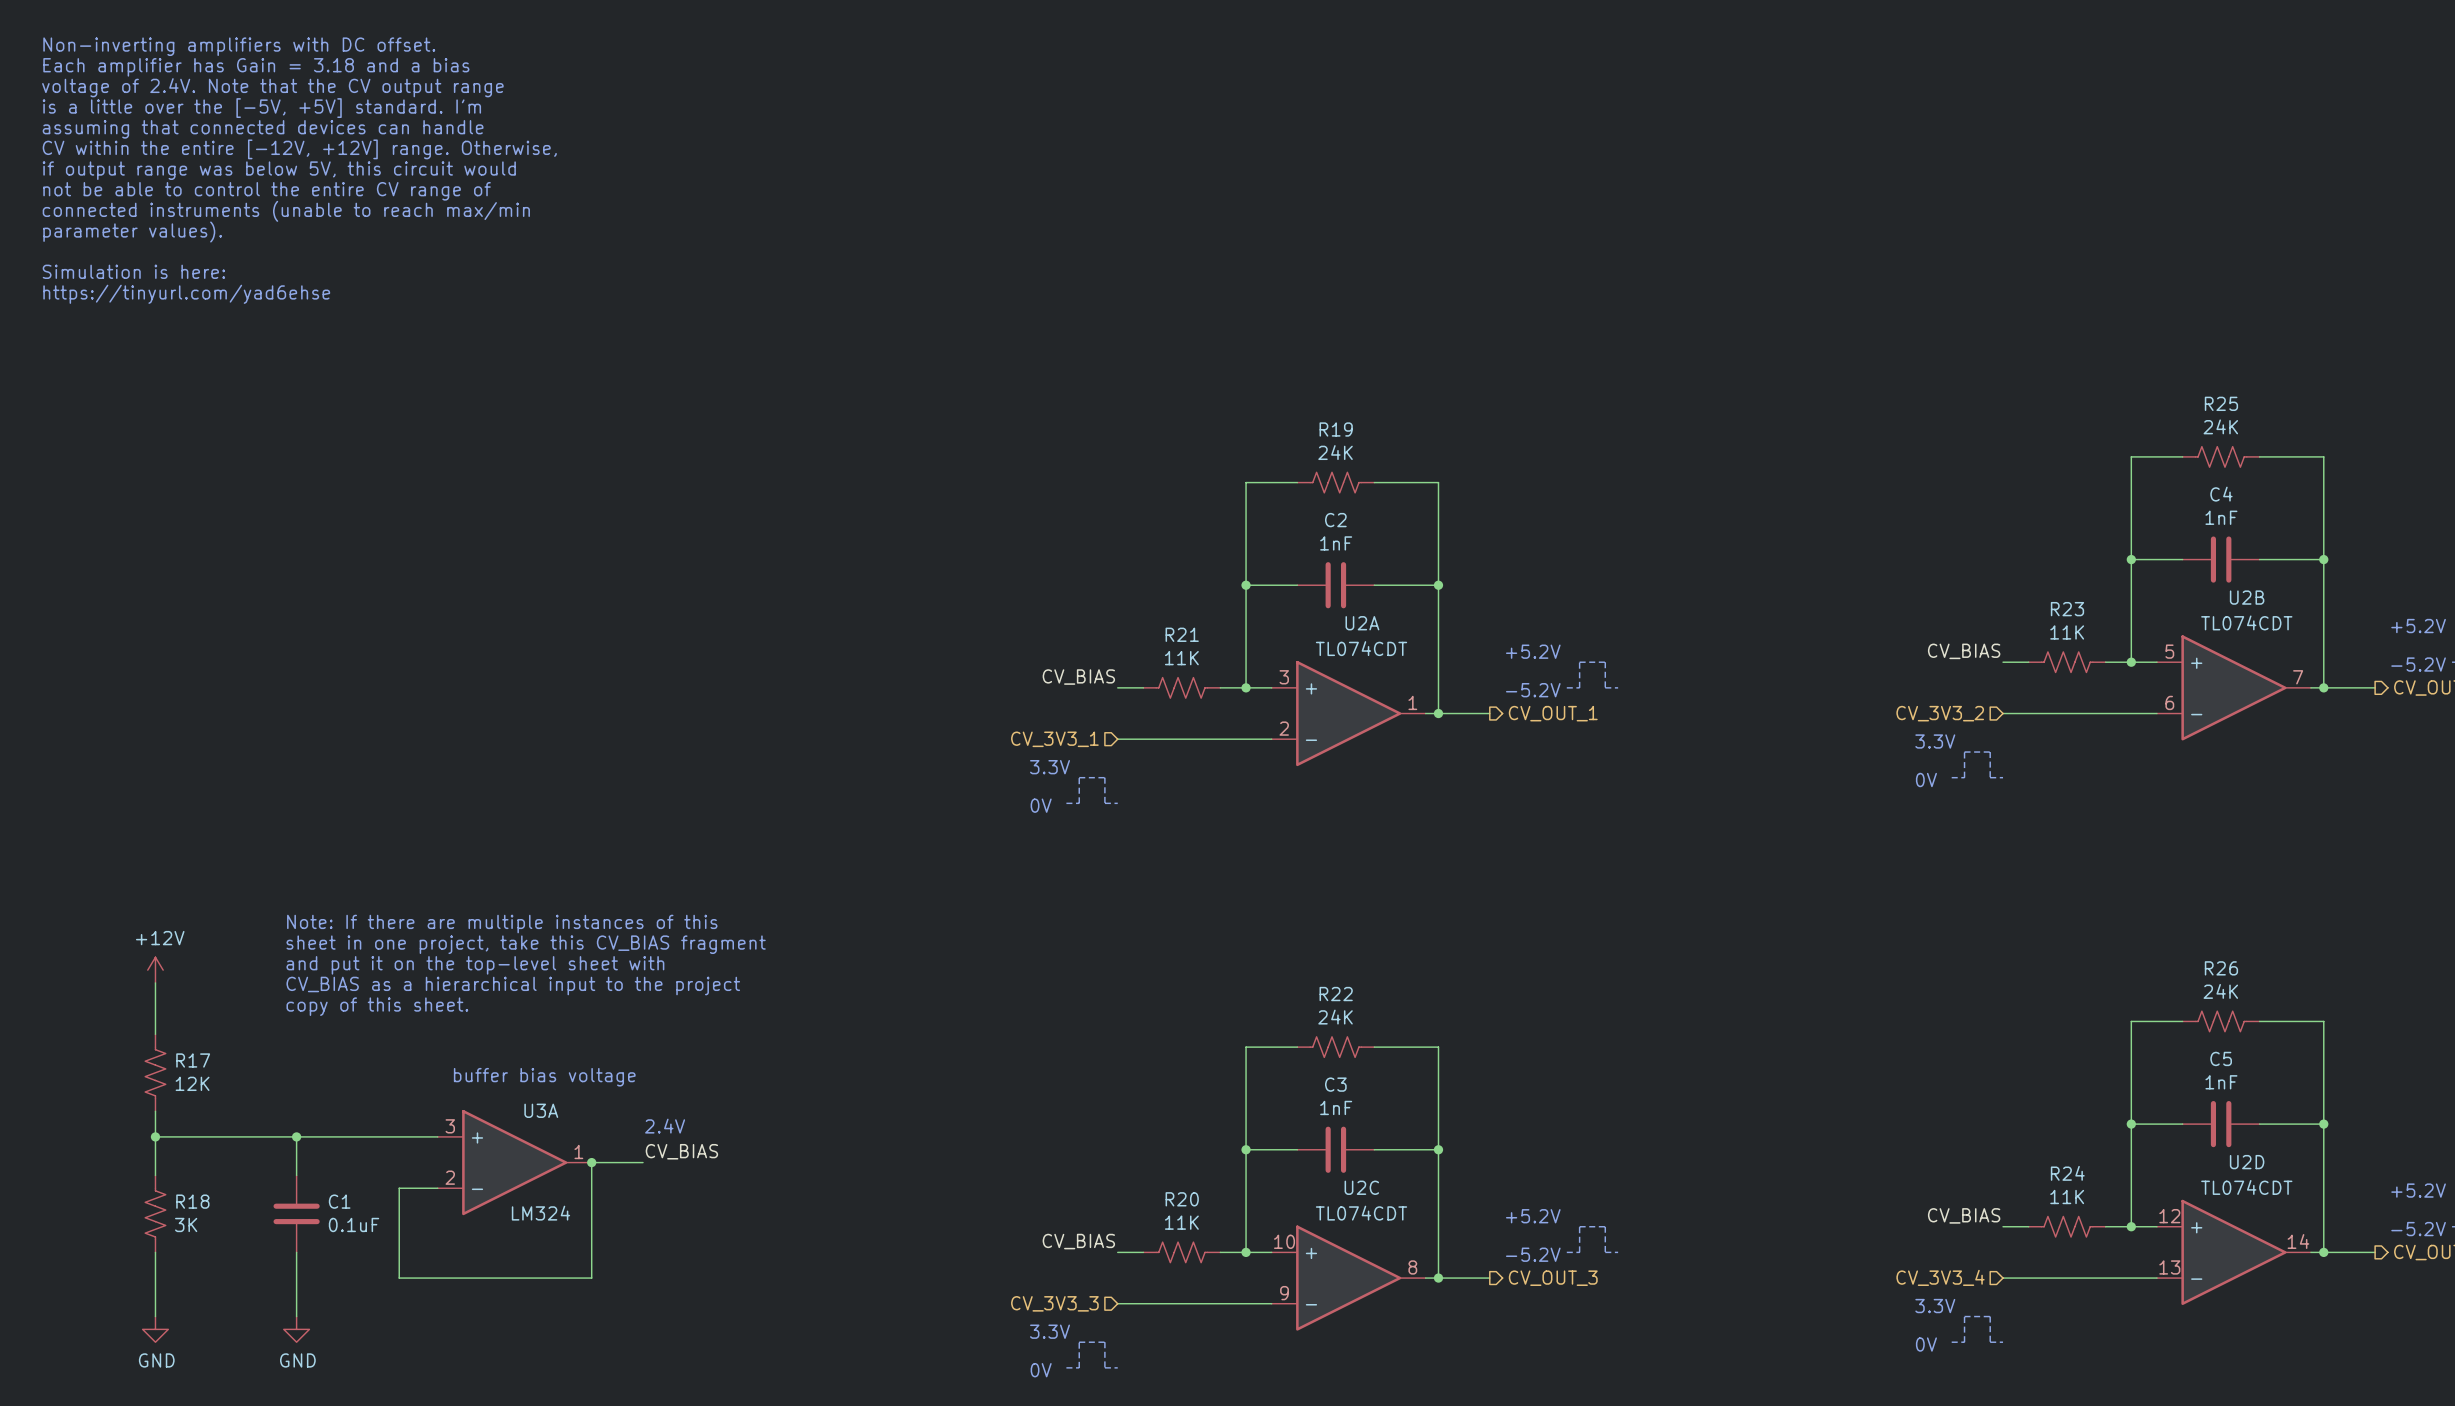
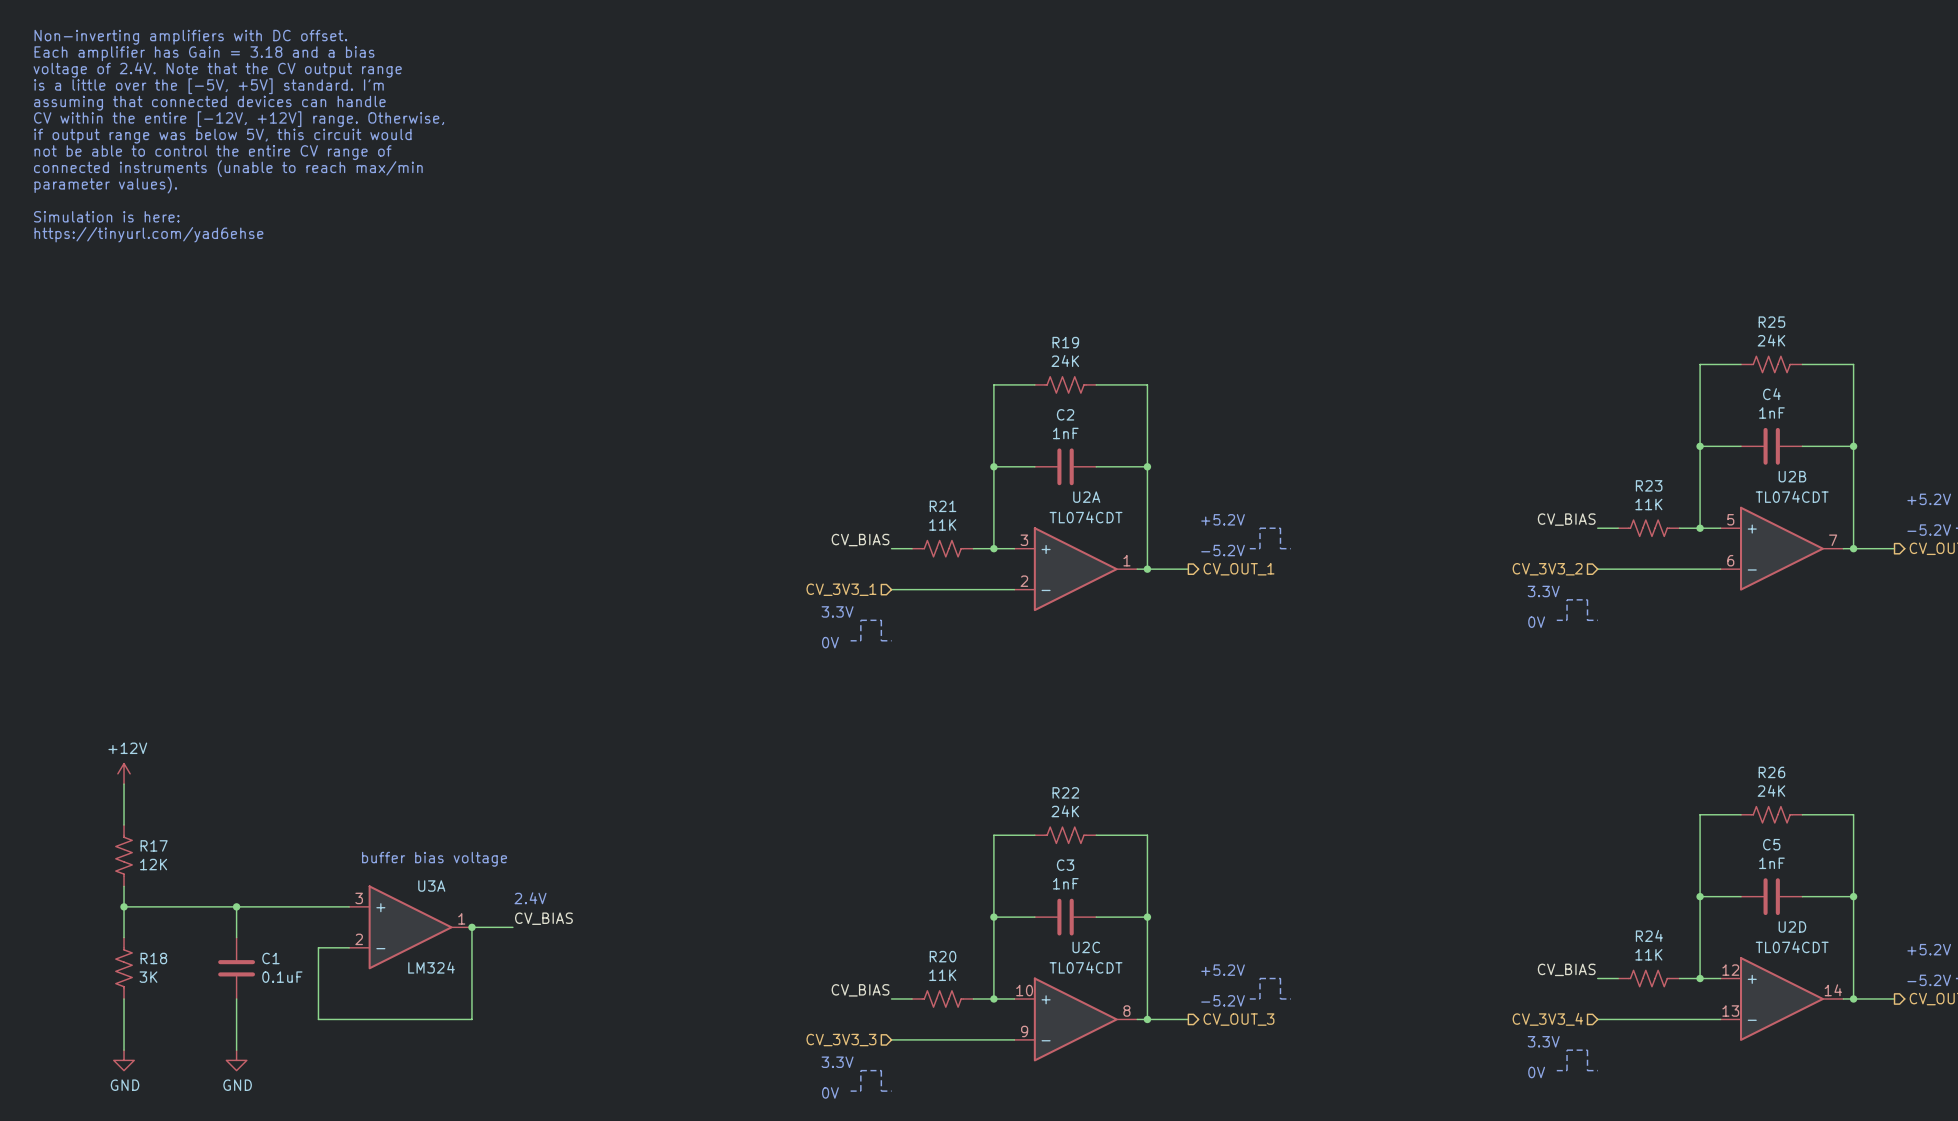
text: Note: If there are multiple instances of this (502, 924) -> none
text: sheet in one project, take this CV_BIAS fragment (526, 944) -> none
text: and put it on the top-level sheet with (475, 965) -> none
text: CV_BIAS as a hierarchical input to the project (513, 986) -> none
text: copy of this sheet. (377, 1006) -> none

